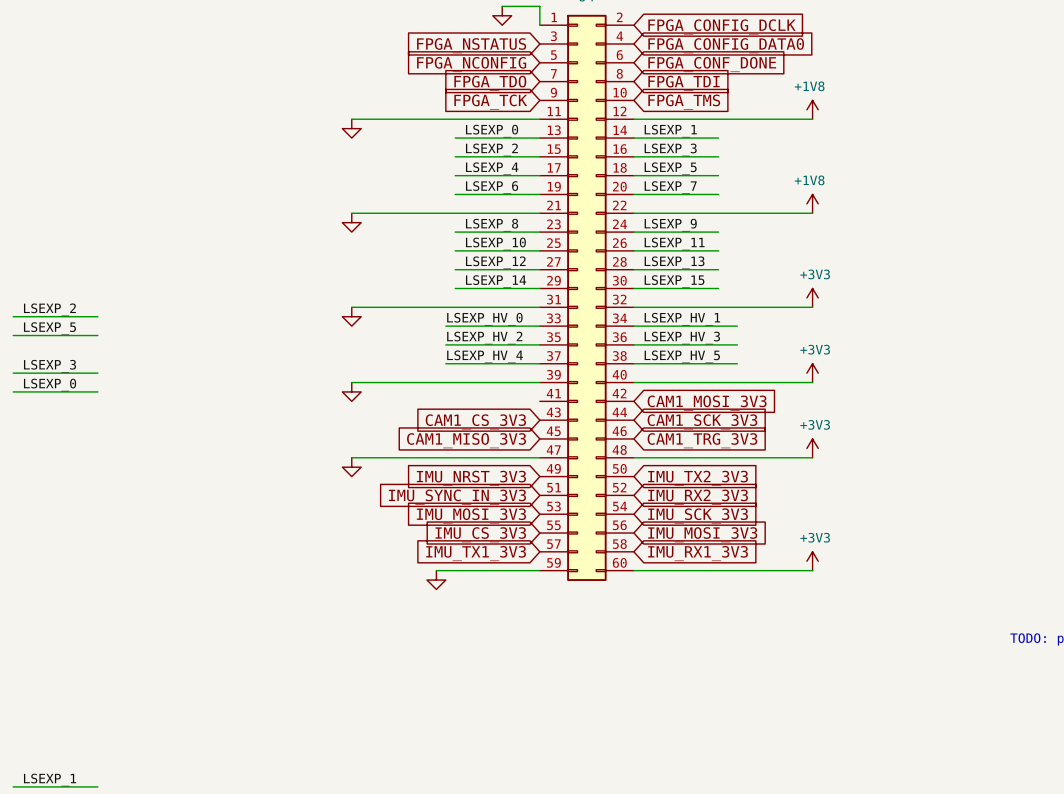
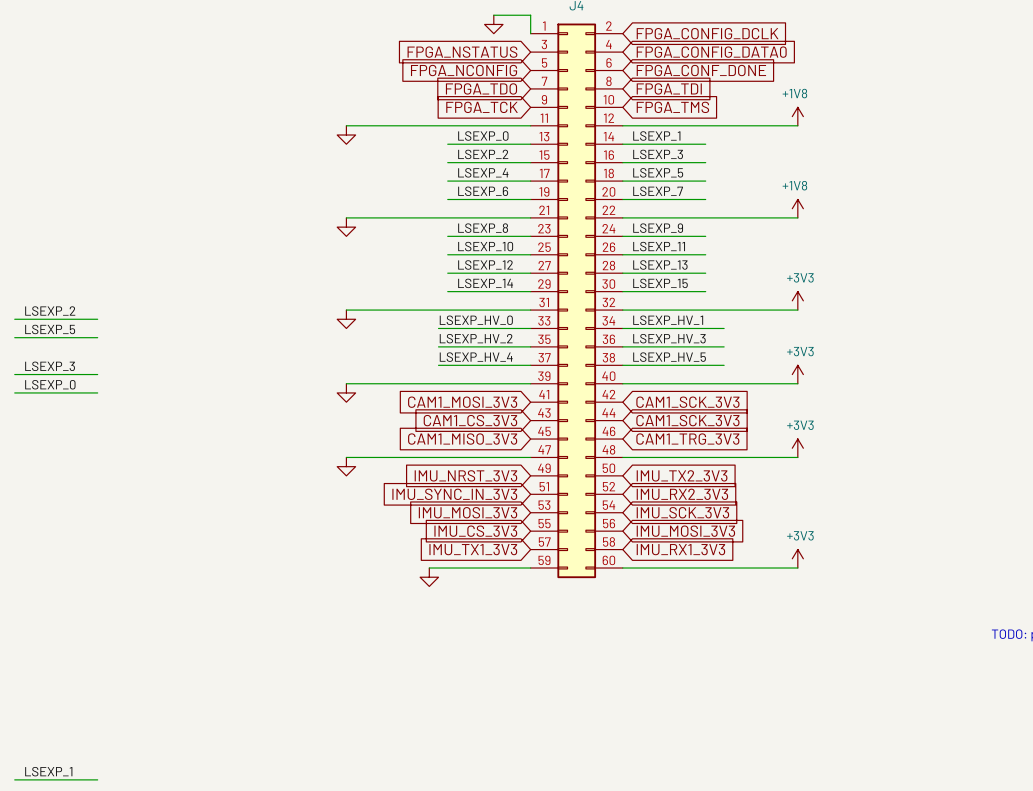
global label: none -> CAM1_MOSI_3V3 (462, 402)
global label: CAM1_MOSI_3V3 (707, 403) -> CAM1_SCK_3V3 (687, 402)

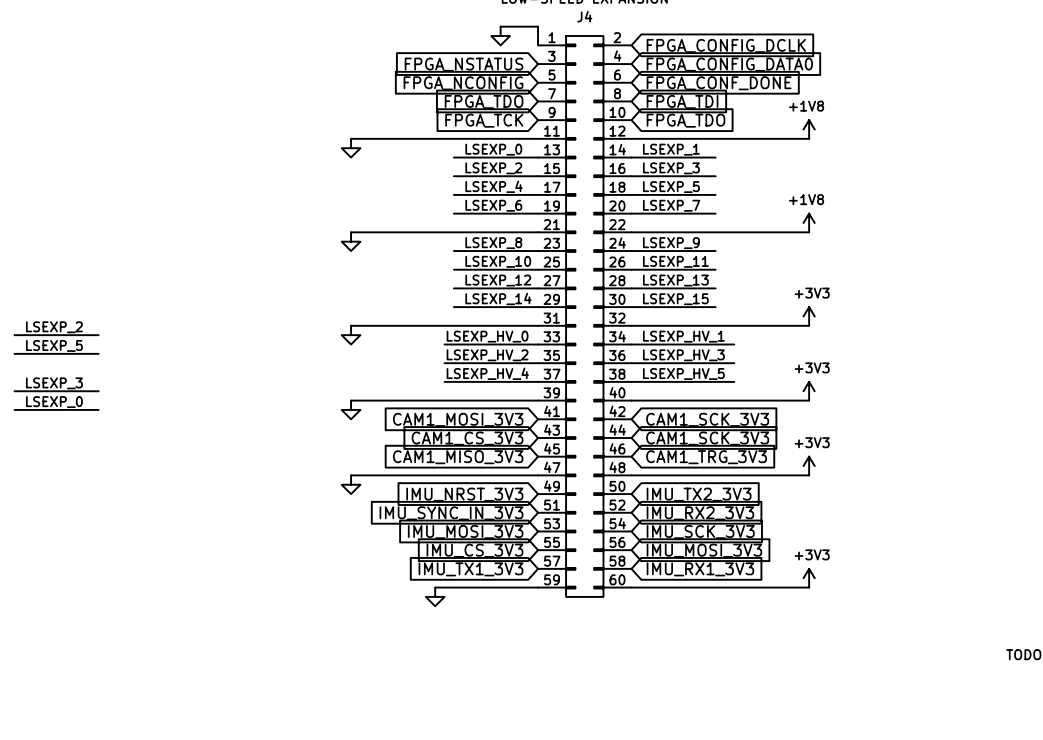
global label: FPGA_TMS (672, 107) -> FPGA_TDO (686, 120)

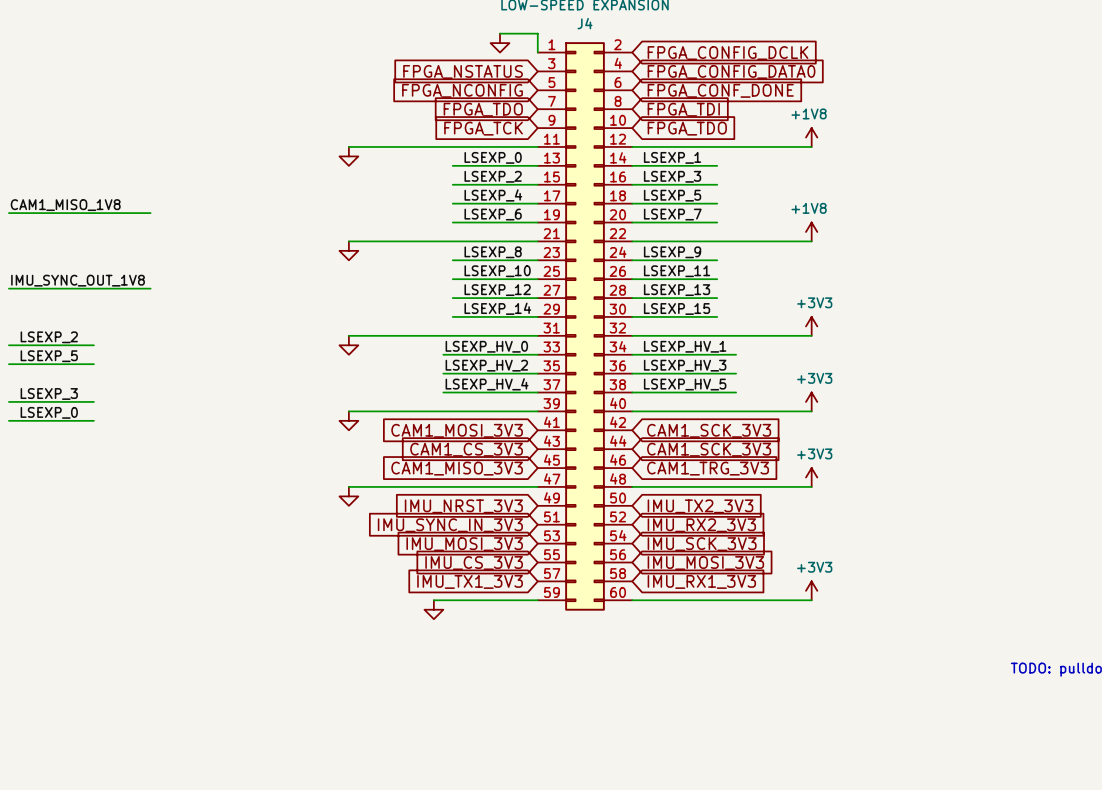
label: none -> CAM1_MISO_1V8 (65, 205)
wire: none -> (8, 213) (150, 213)
label: none -> IMU_SYNC_OUT_1V8 (78, 280)
wire: none -> (8, 288) (150, 288)

